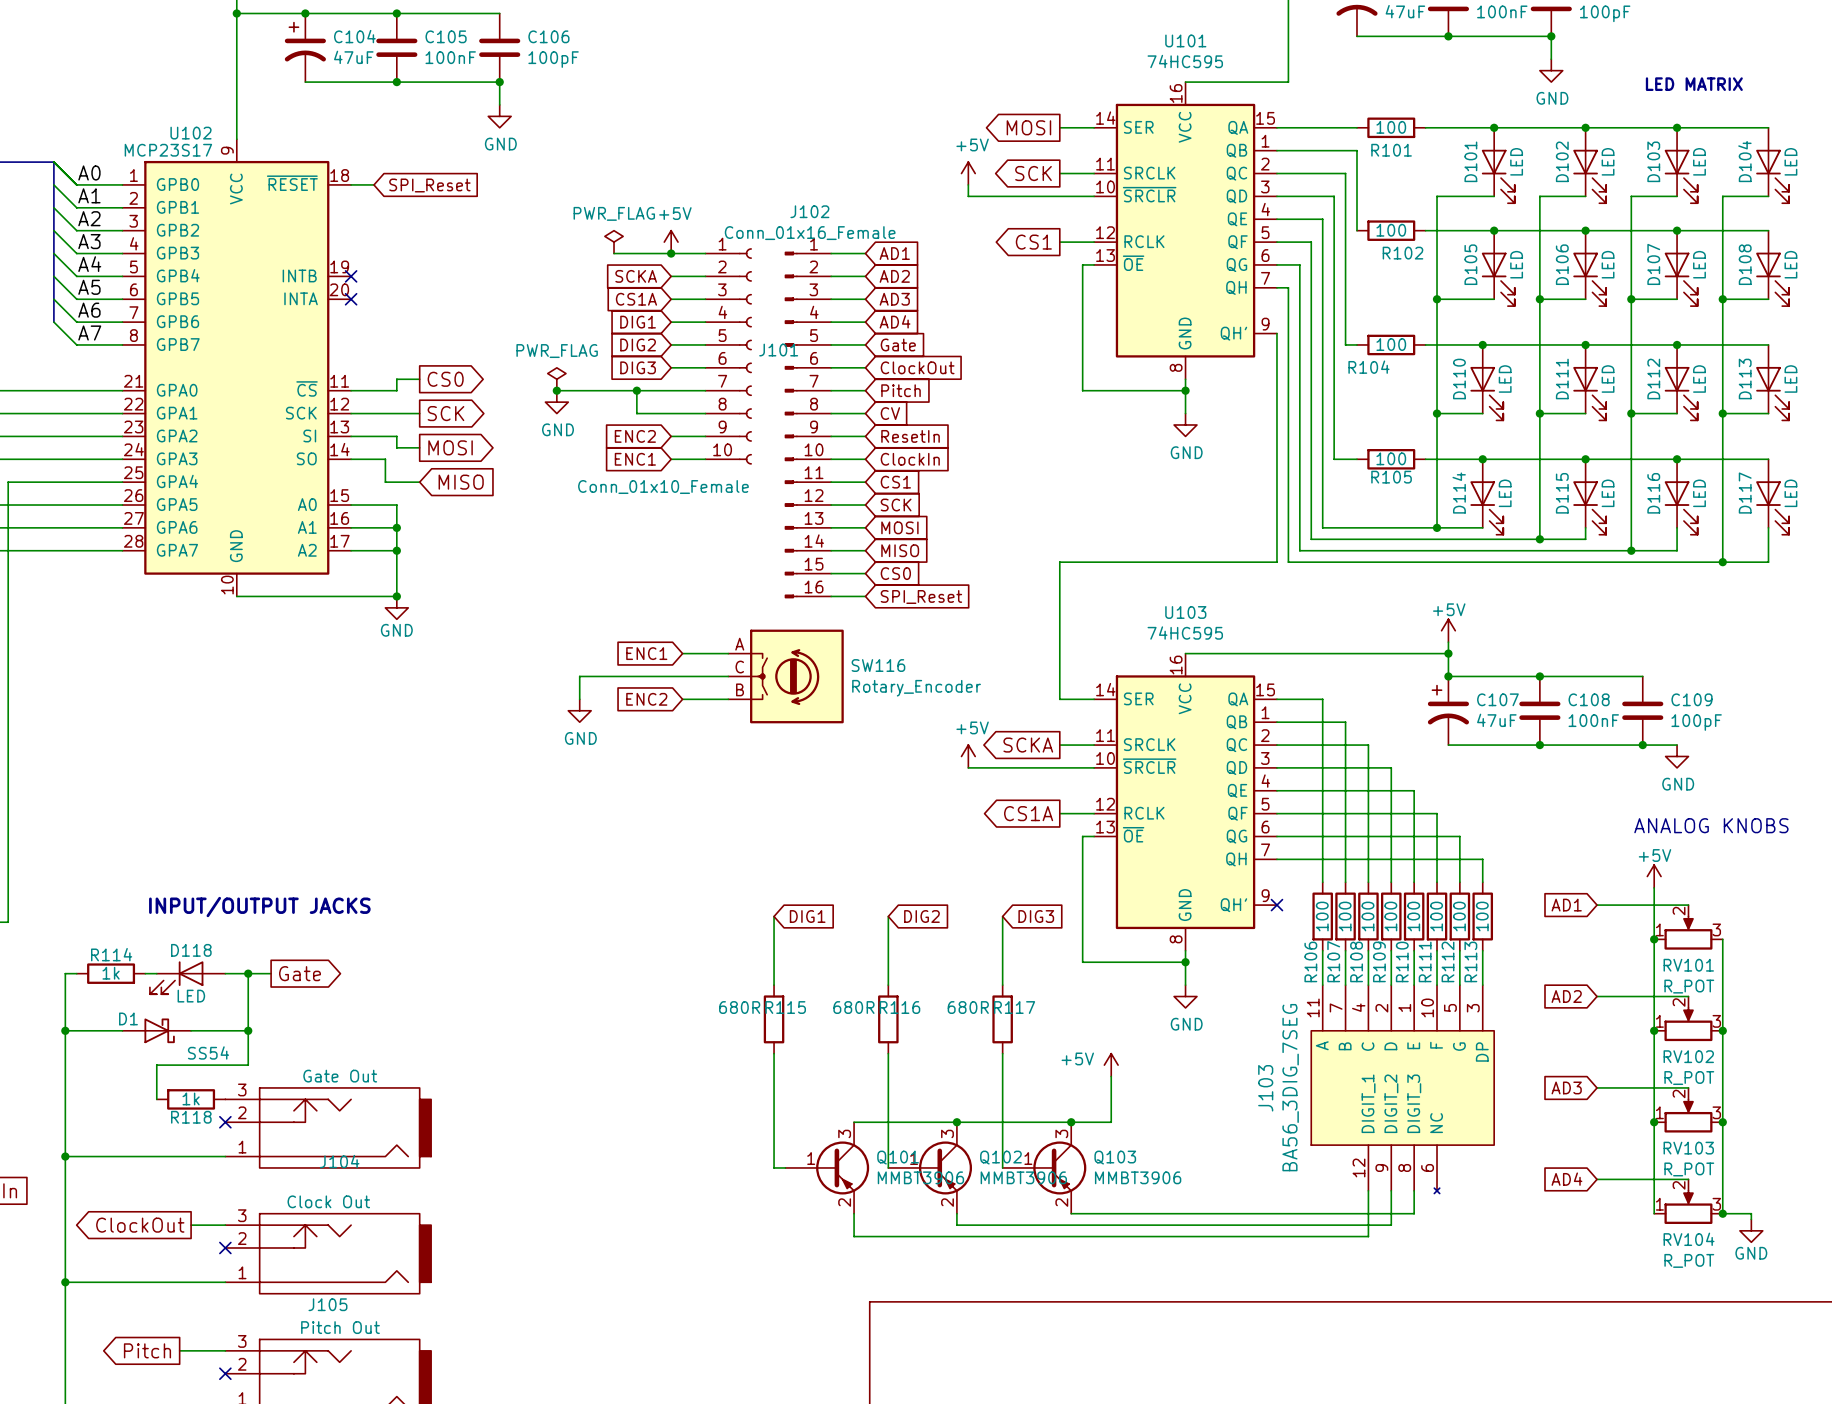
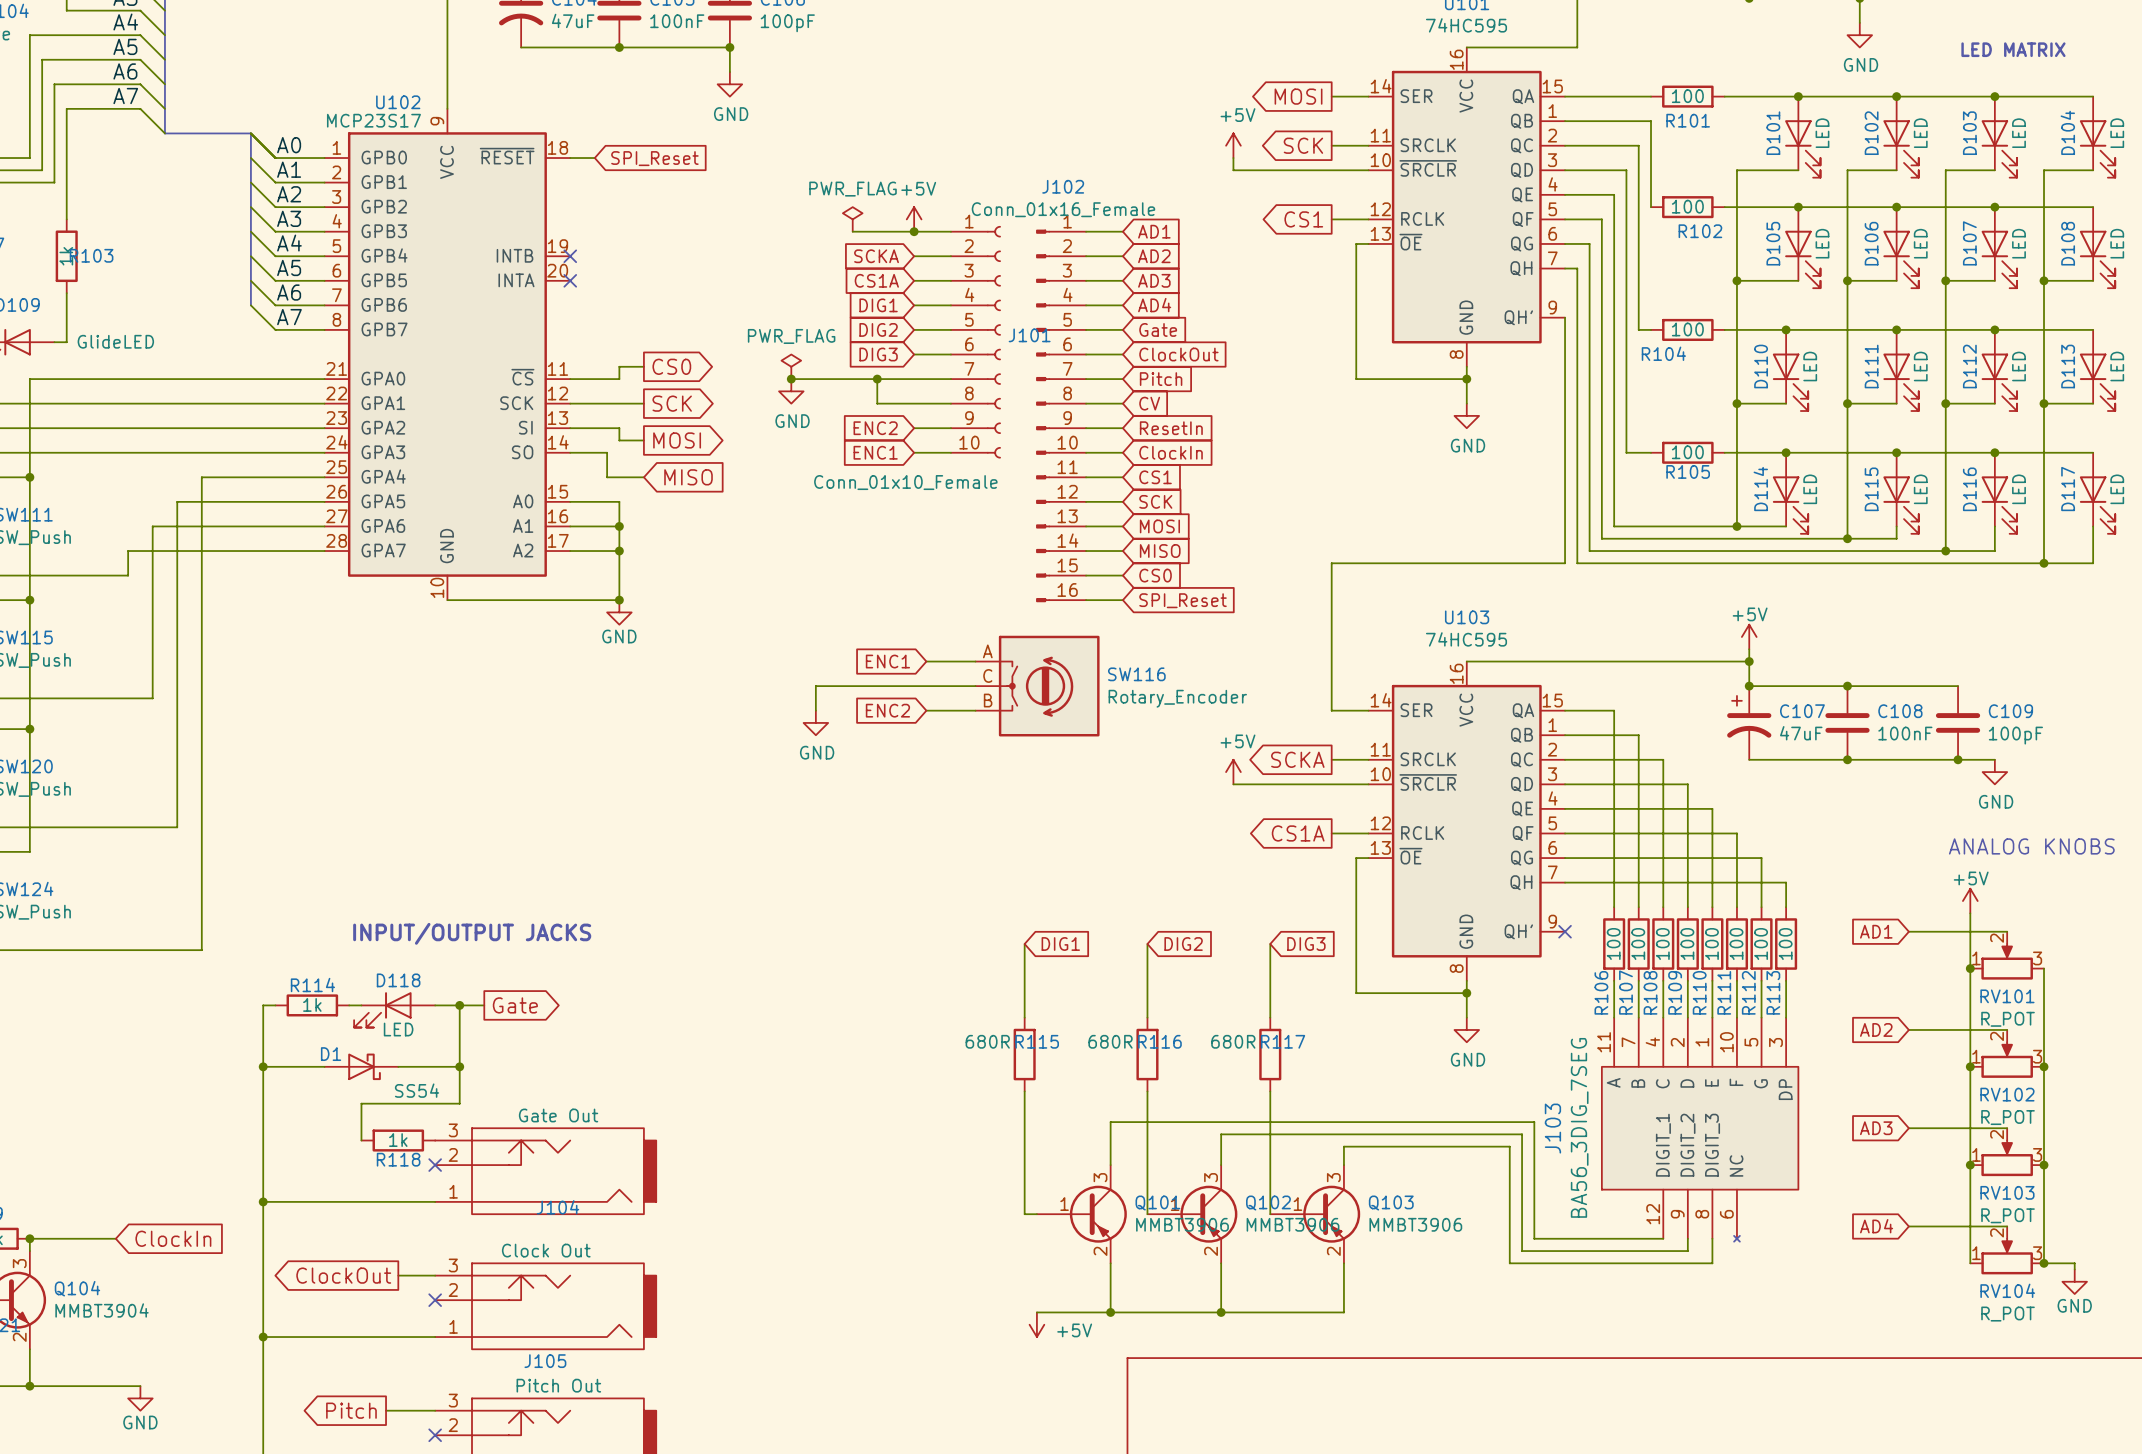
power symbol: +5V (1111, 1065) -> none
wire: (1111, 1076) (1111, 1122) (854, 1122) -> none
junction: (956, 1122) -> none
junction: (1071, 1122) -> none
wire: (1368, 1190) (1368, 1236) (854, 1236) -> (1663, 1238) (1534, 1238) (1534, 1122) (1110, 1122) (1110, 1165)
wire: (1391, 1202) (1391, 1225) (956, 1225) -> (1687, 1251) (1522, 1251) (1522, 1134) (1221, 1134) (1221, 1165)
wire: (1071, 1213) (1225, 1213) -> (1343, 1165) (1343, 1146) (1509, 1146) (1509, 1263)
wire: none -> (1343, 1263) (1343, 1312) (1036, 1312)
wire: none -> (1221, 1275) (1221, 1312)
wire: none -> (1110, 1287) (1110, 1312)
junction: none -> (1110, 1312)
junction: none -> (1221, 1312)
power symbol: none -> +5V (1036, 1324)

